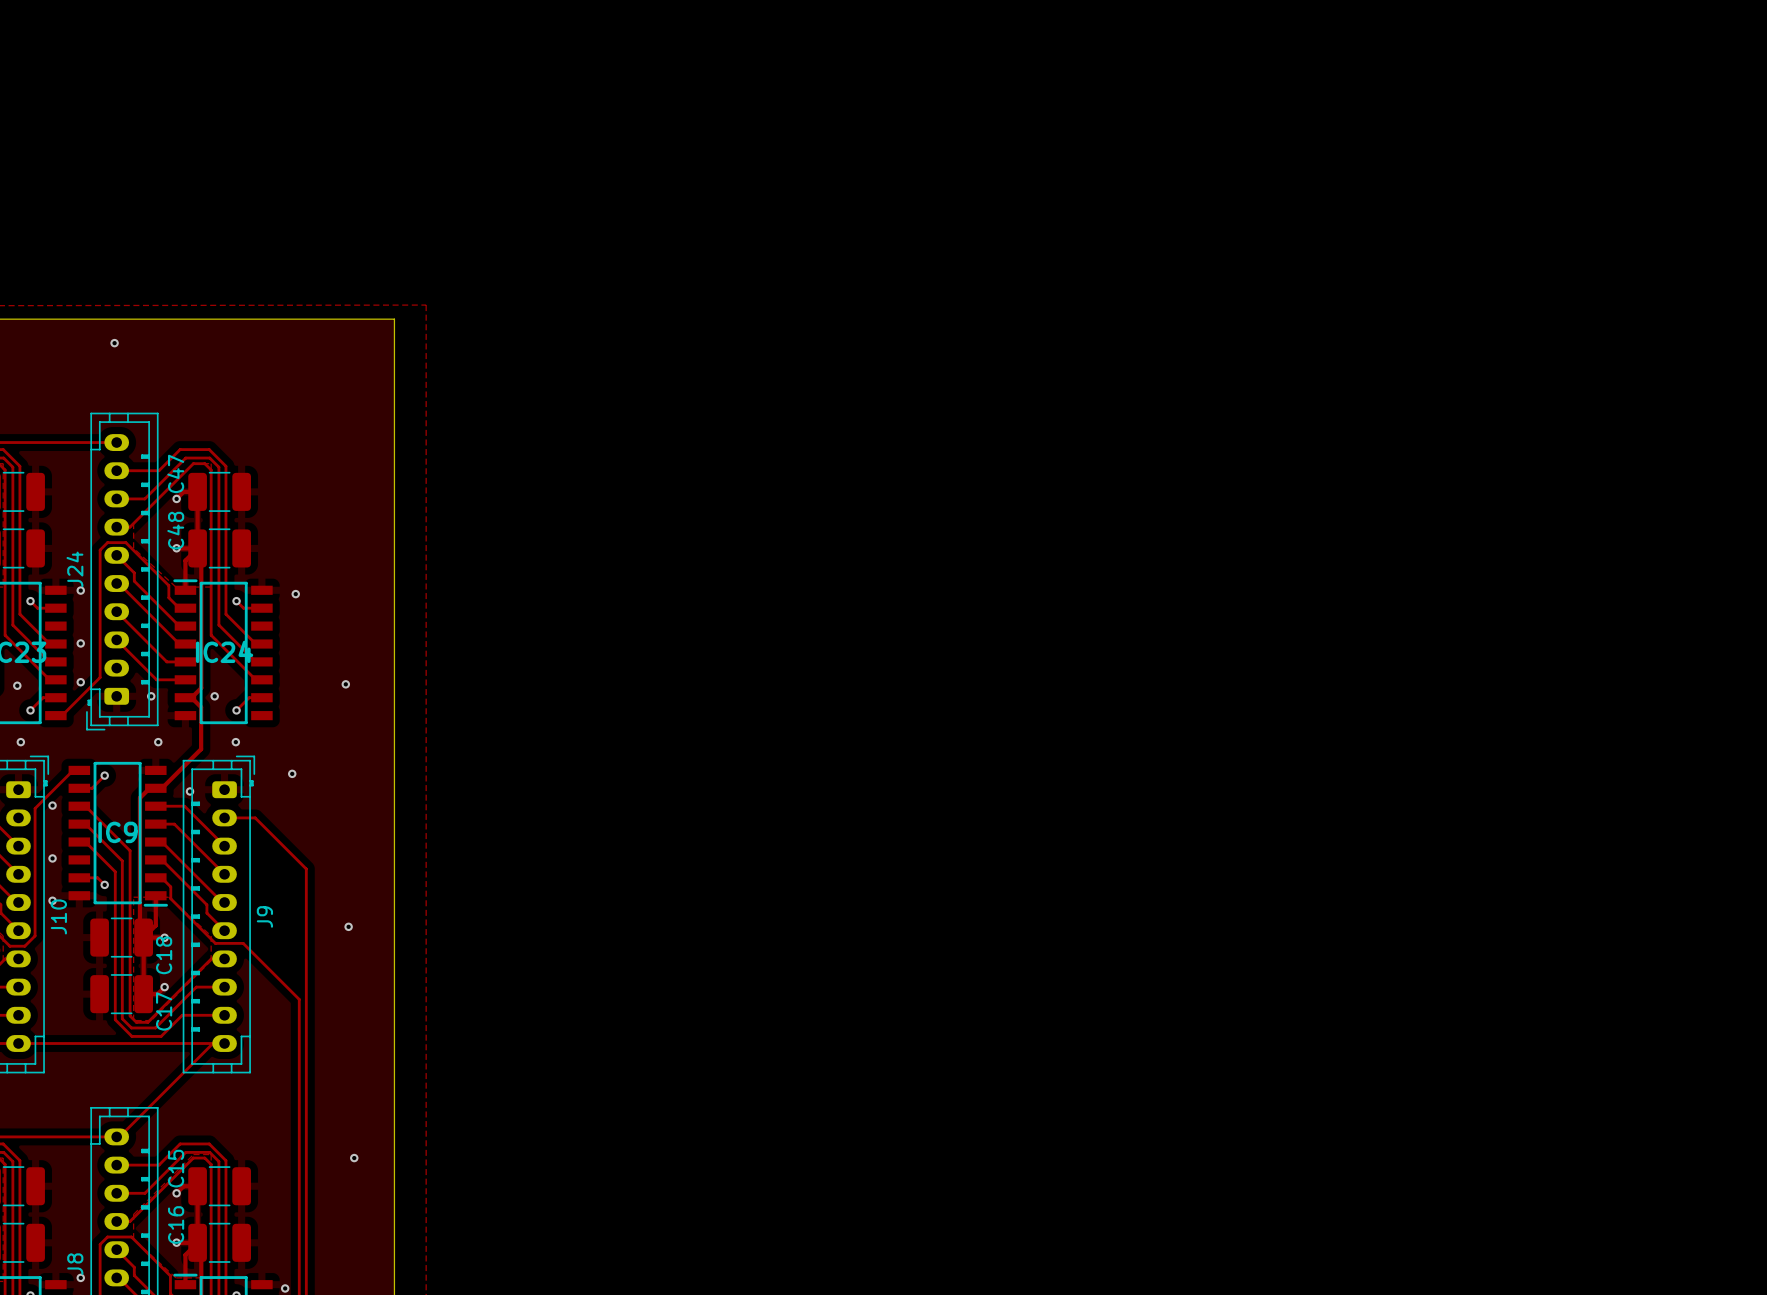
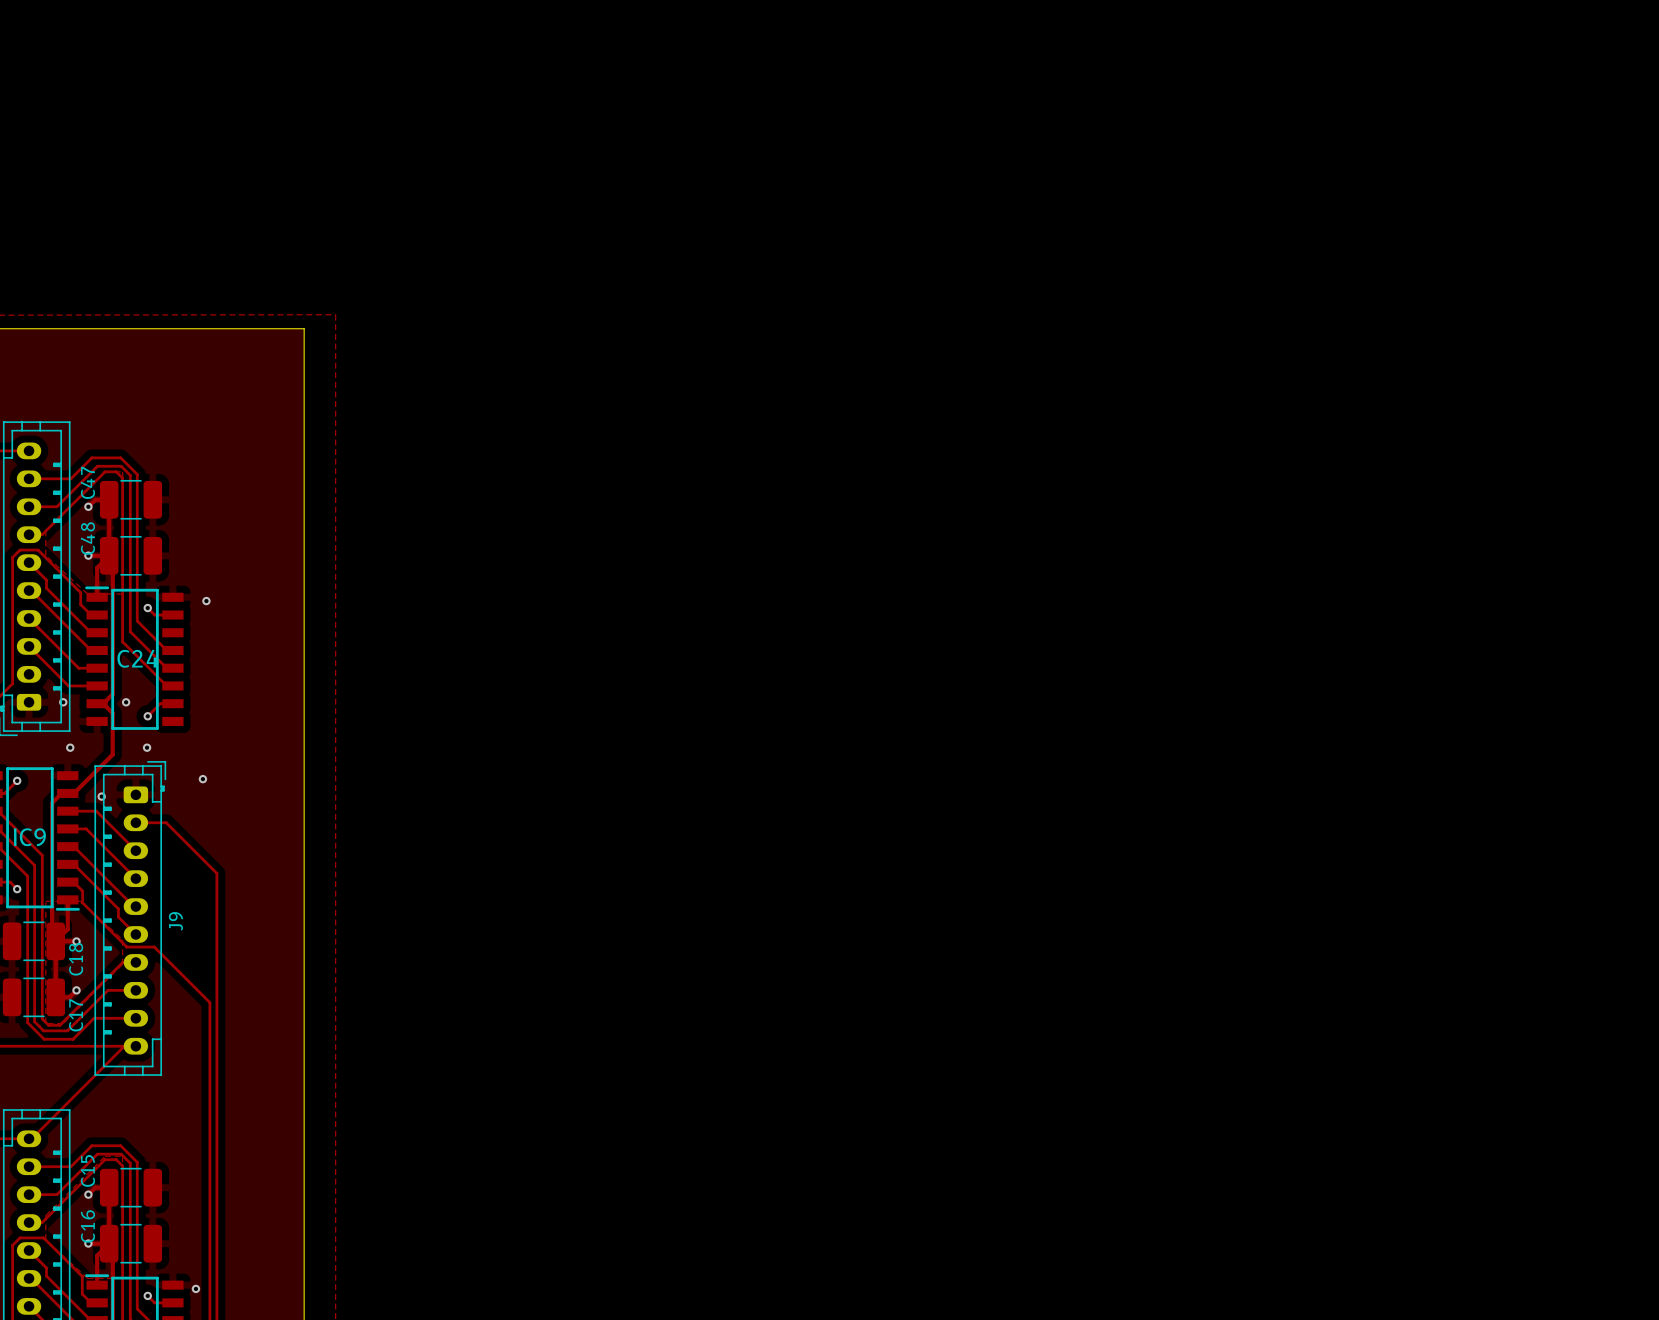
via: (114, 343) -> none
via: (345, 684) -> none
via: (348, 926) -> none
via: (354, 1158) -> none

